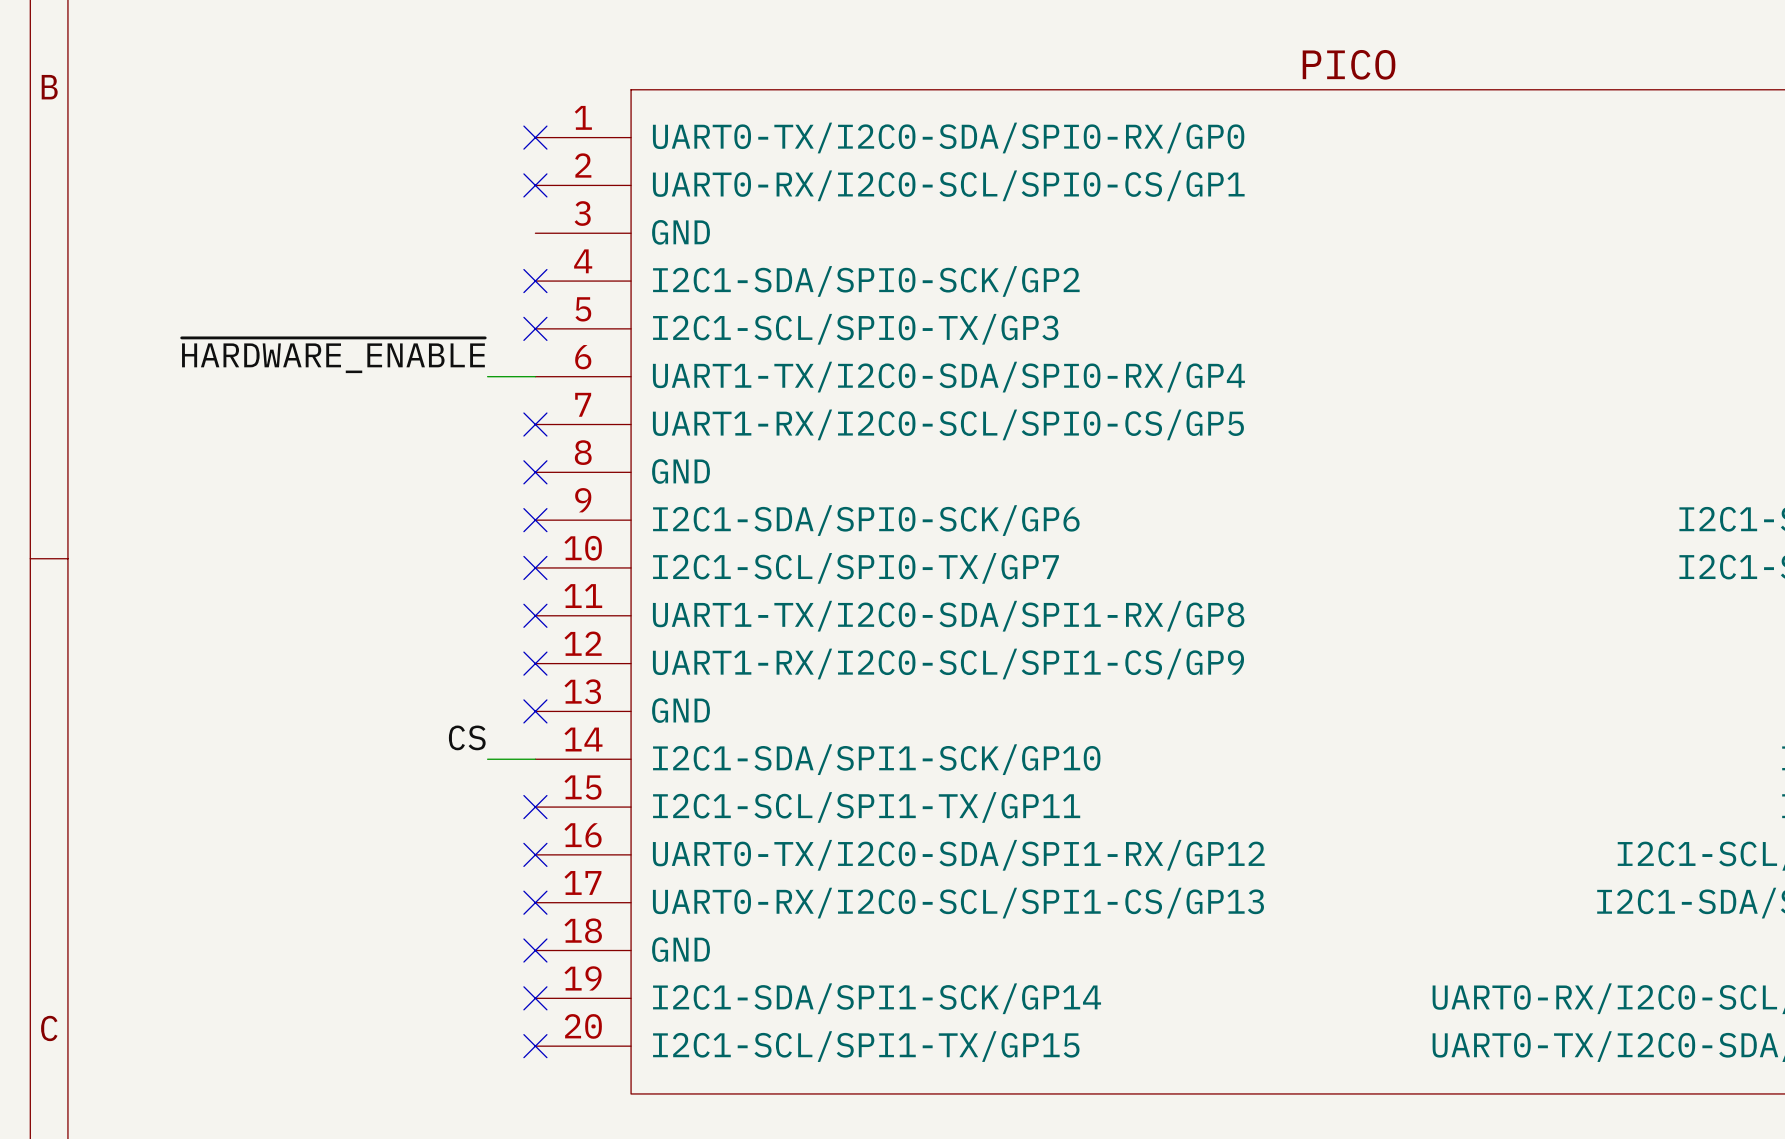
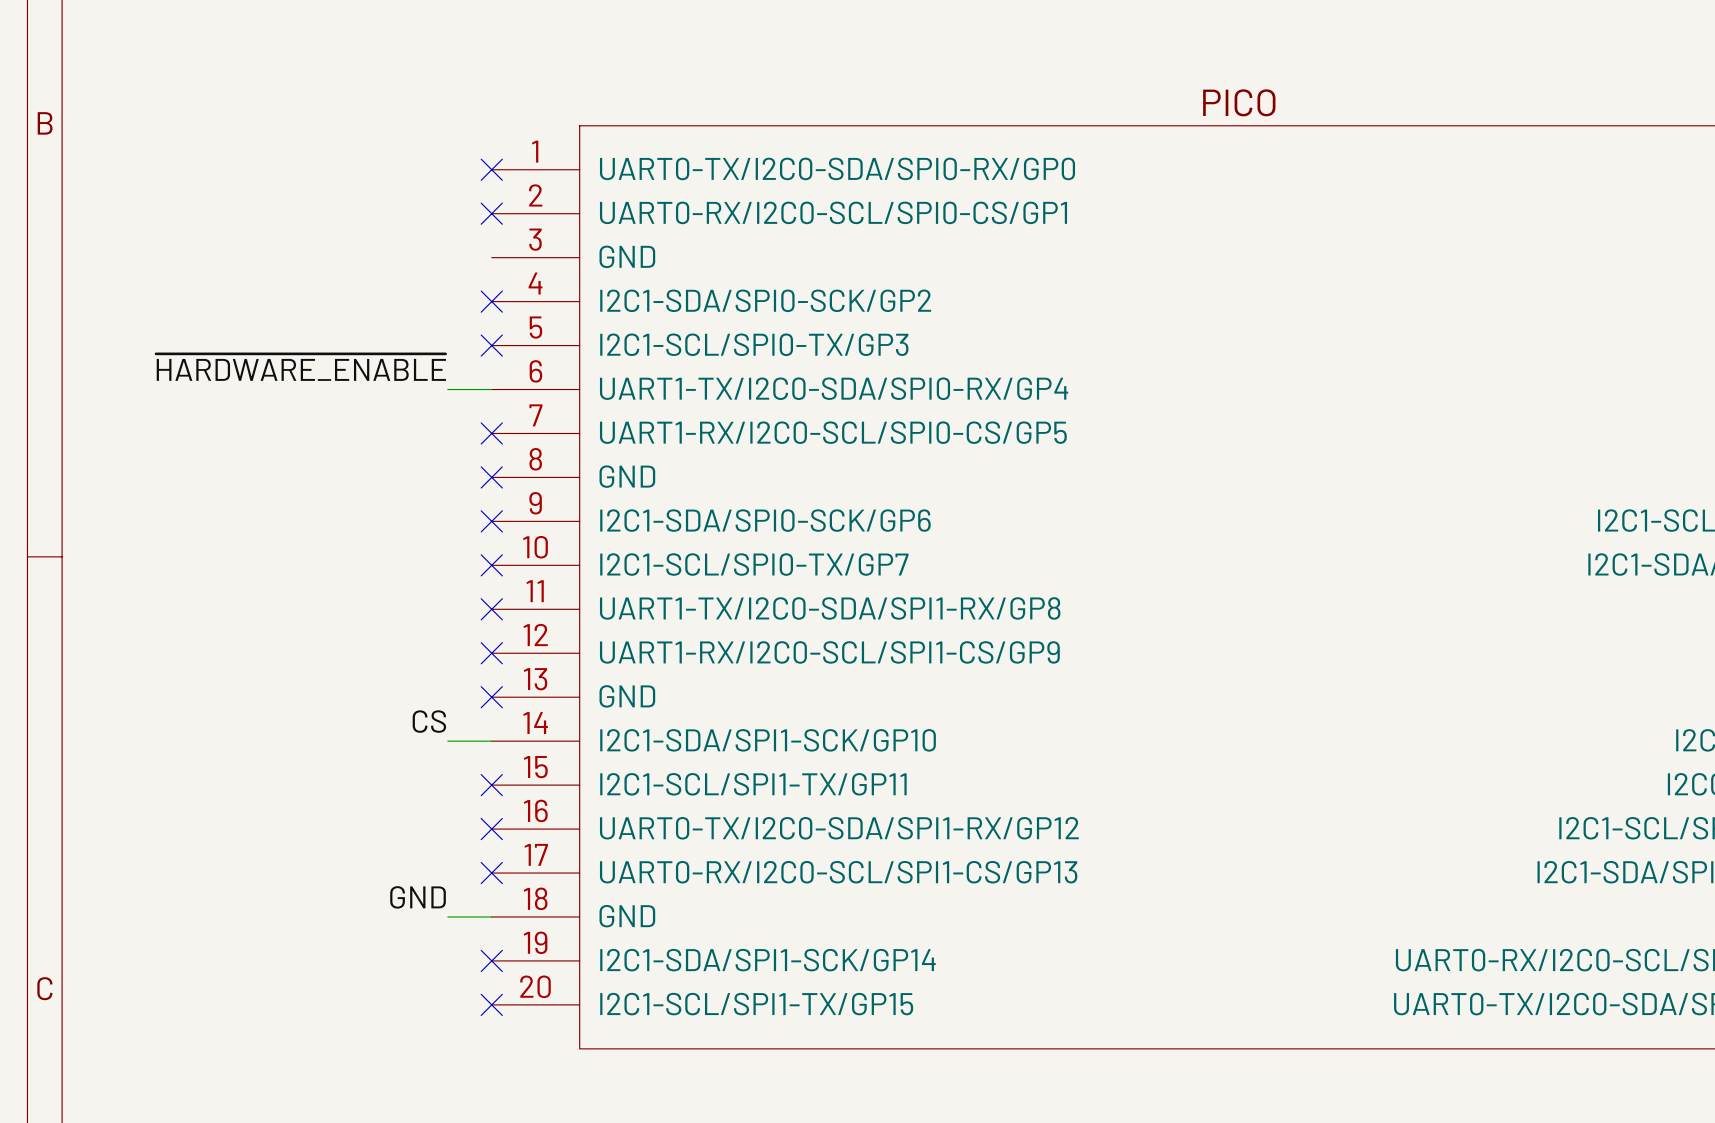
label: none -> GND (418, 897)
wire: none -> (447, 916) (491, 916)
no-connect mark: (535, 950) -> none

